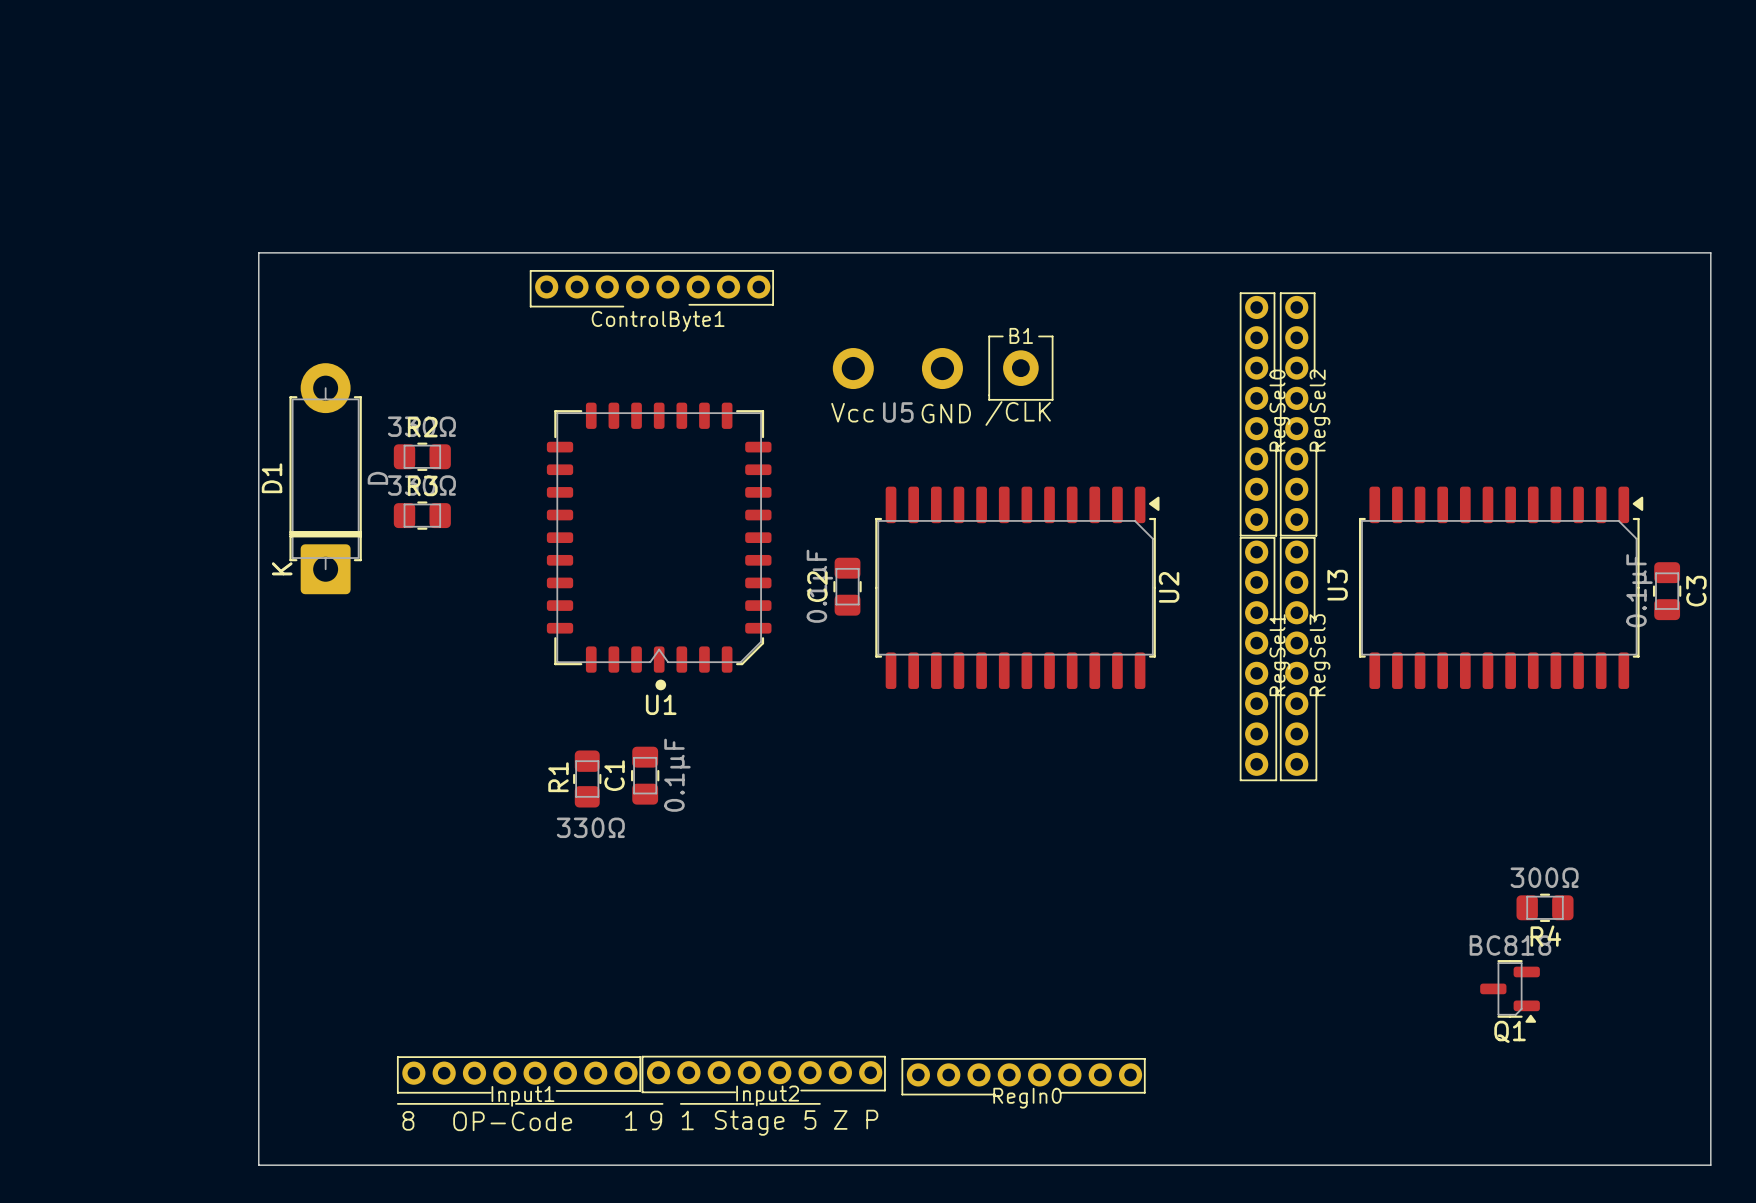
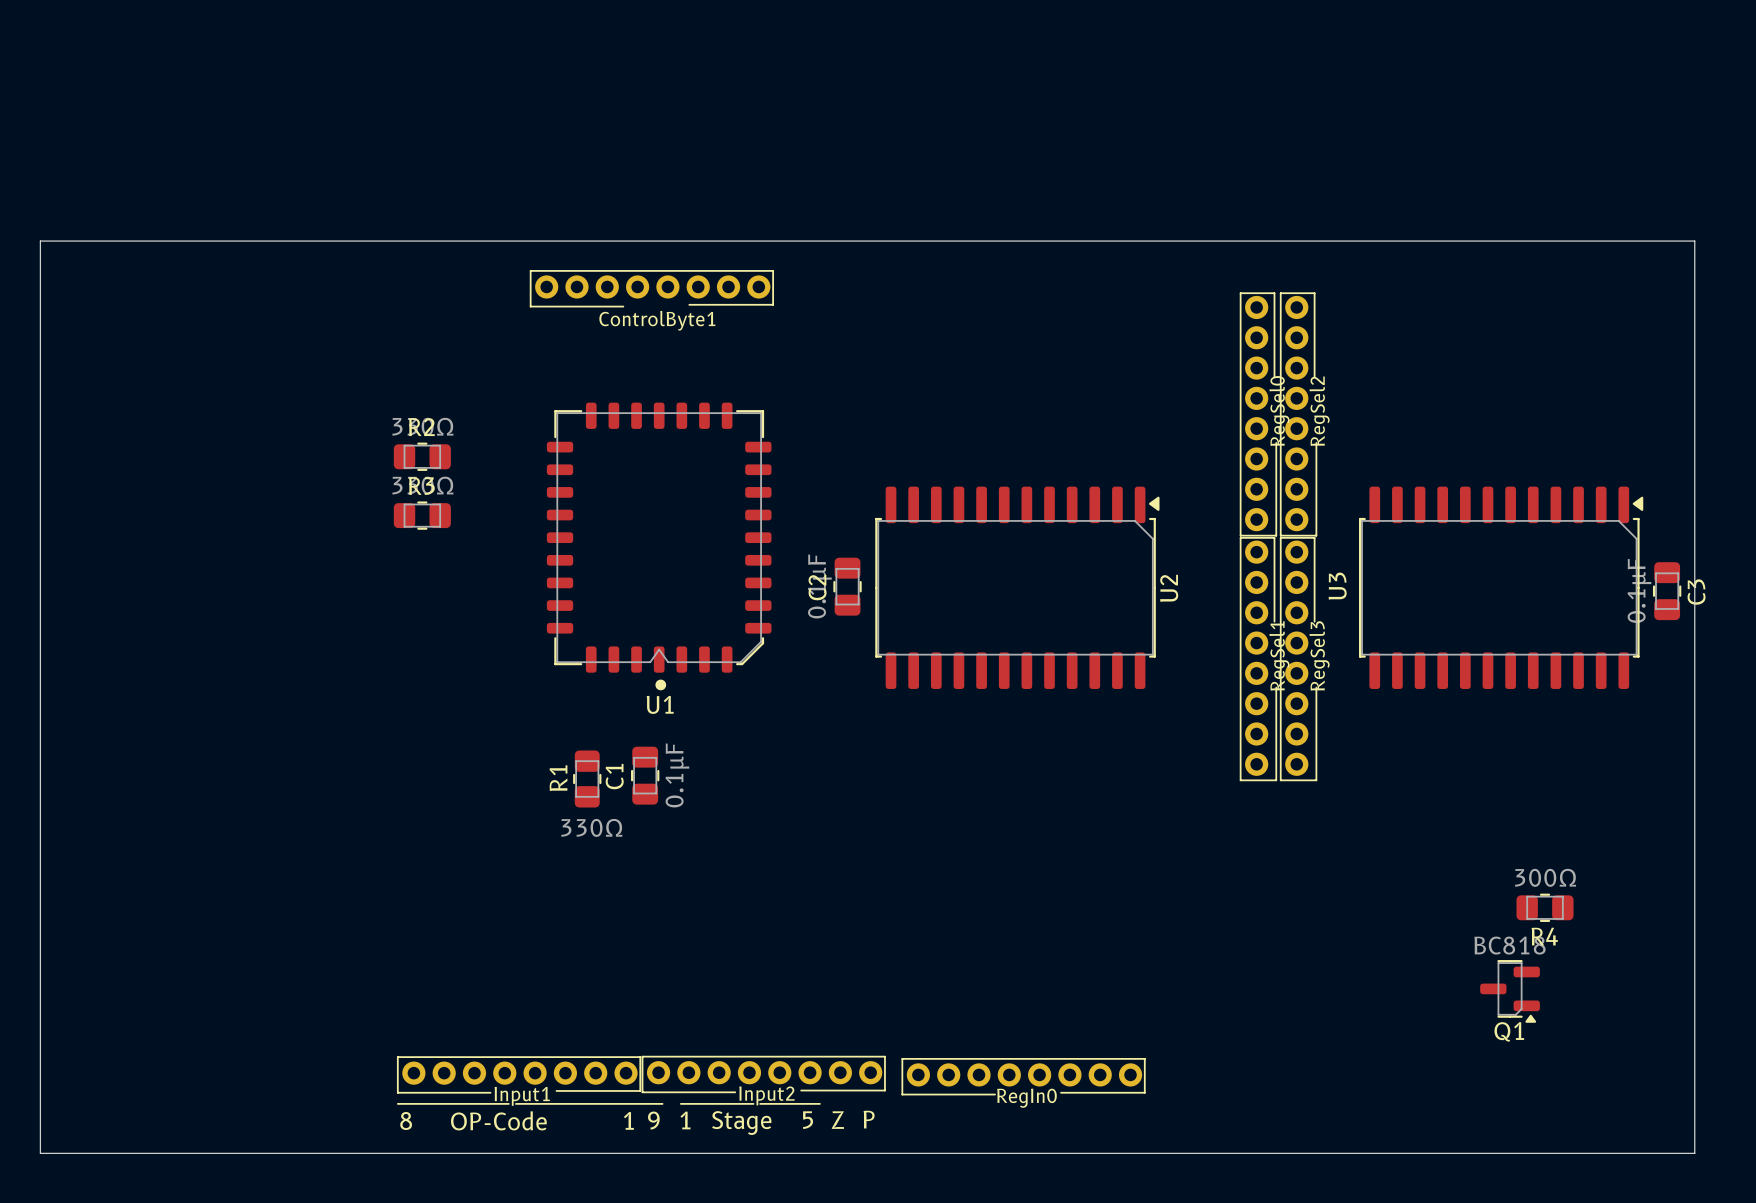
board edge: (258, 252) (1710, 252) (1710, 1165) (258, 1165) (258, 252) -> (40, 241) (40, 1153) (1694, 1153) (1694, 241) (40, 241)
U5: (897, 368) -> none
B1: (1020, 368) -> none
text: /CLK (1018, 413) -> none
D1: D (325, 478) -> none

